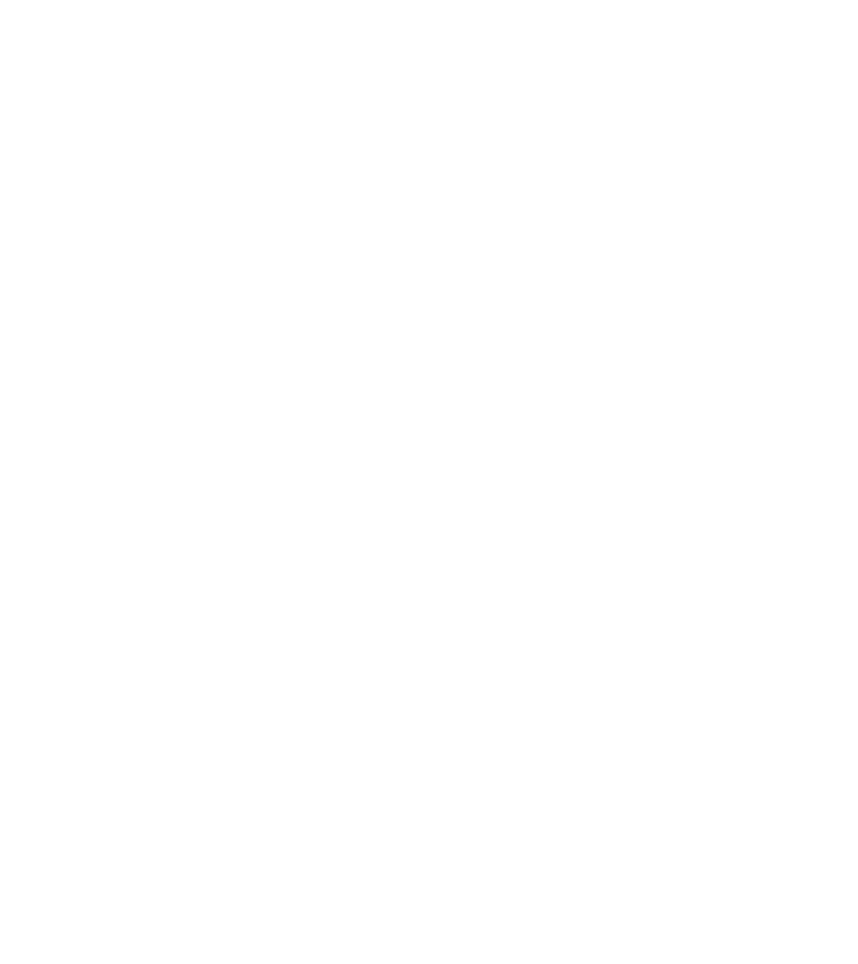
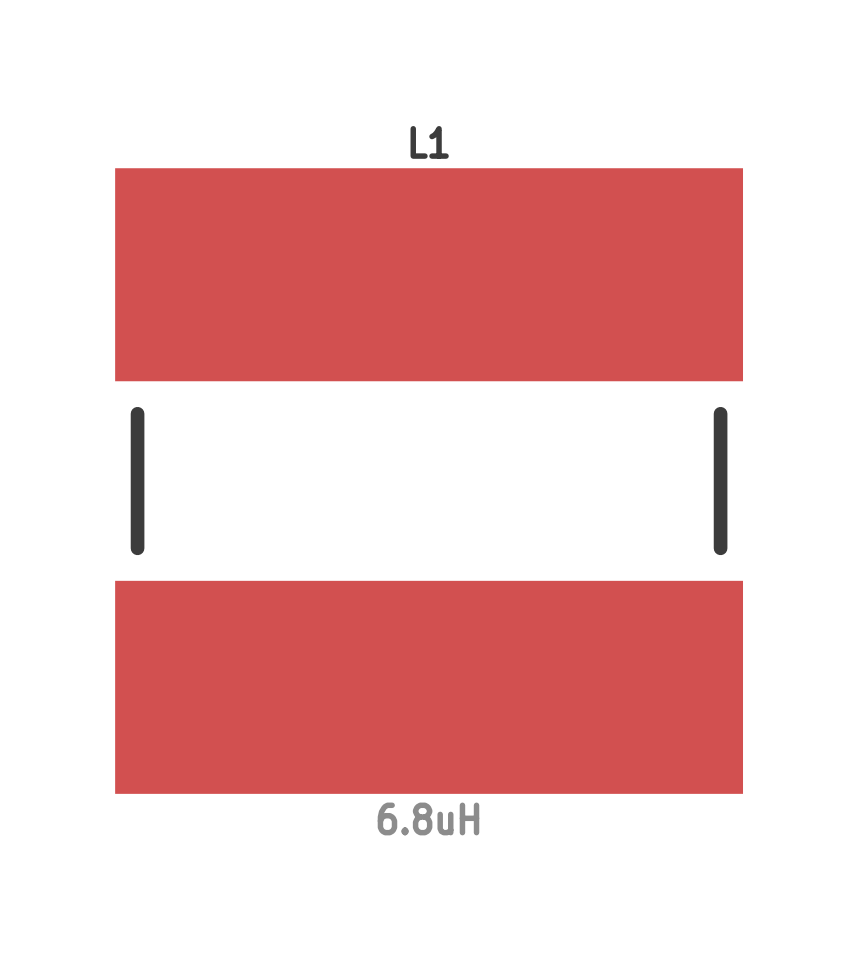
L1: none -> 6.8uH (429, 481)

